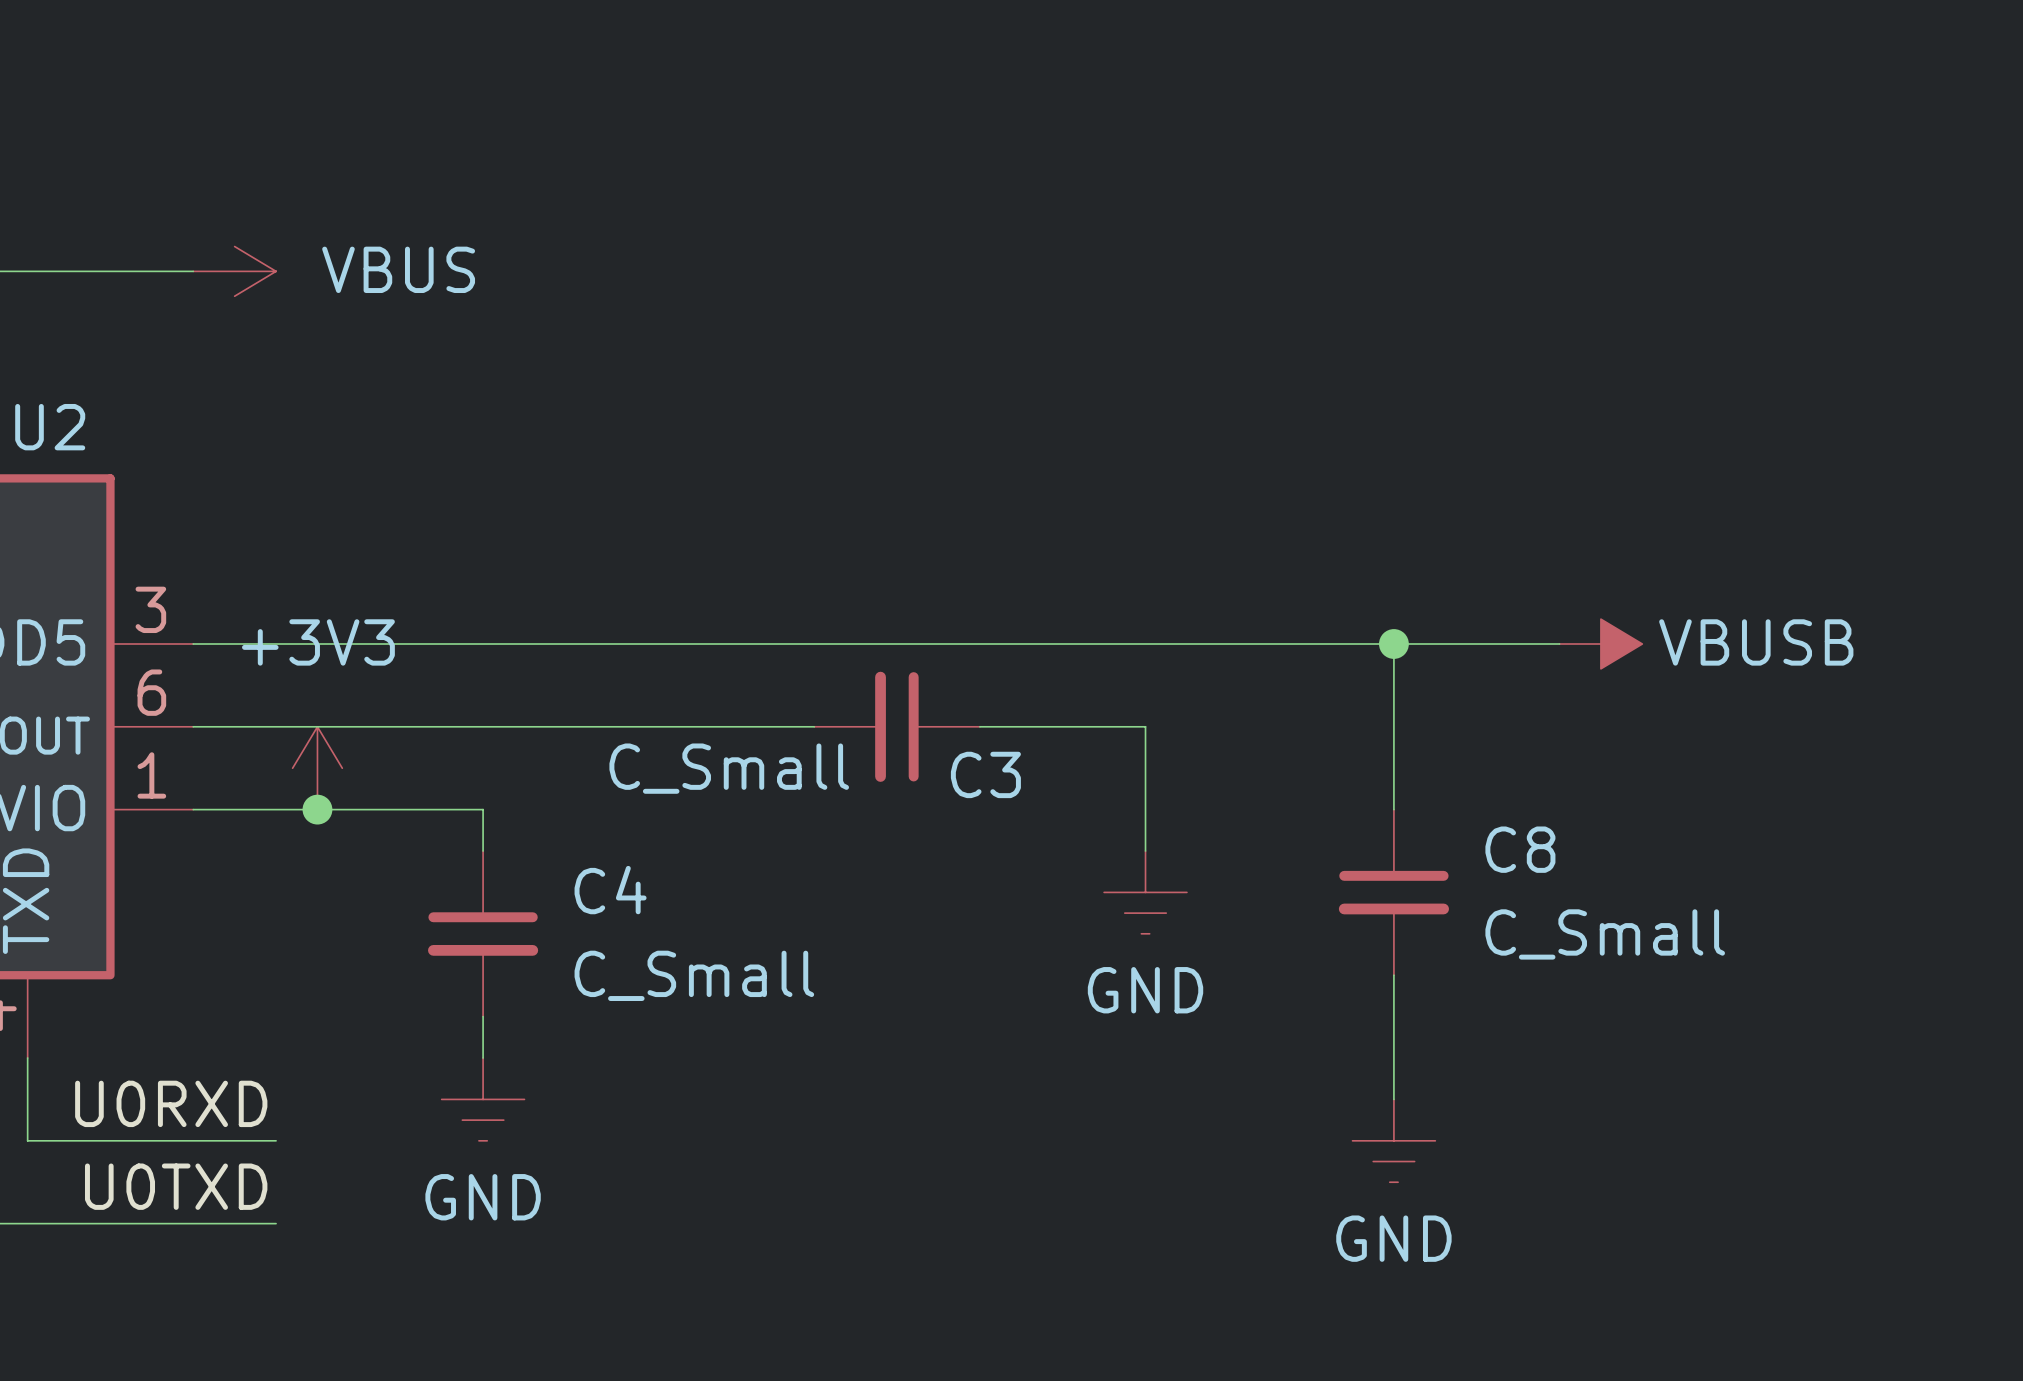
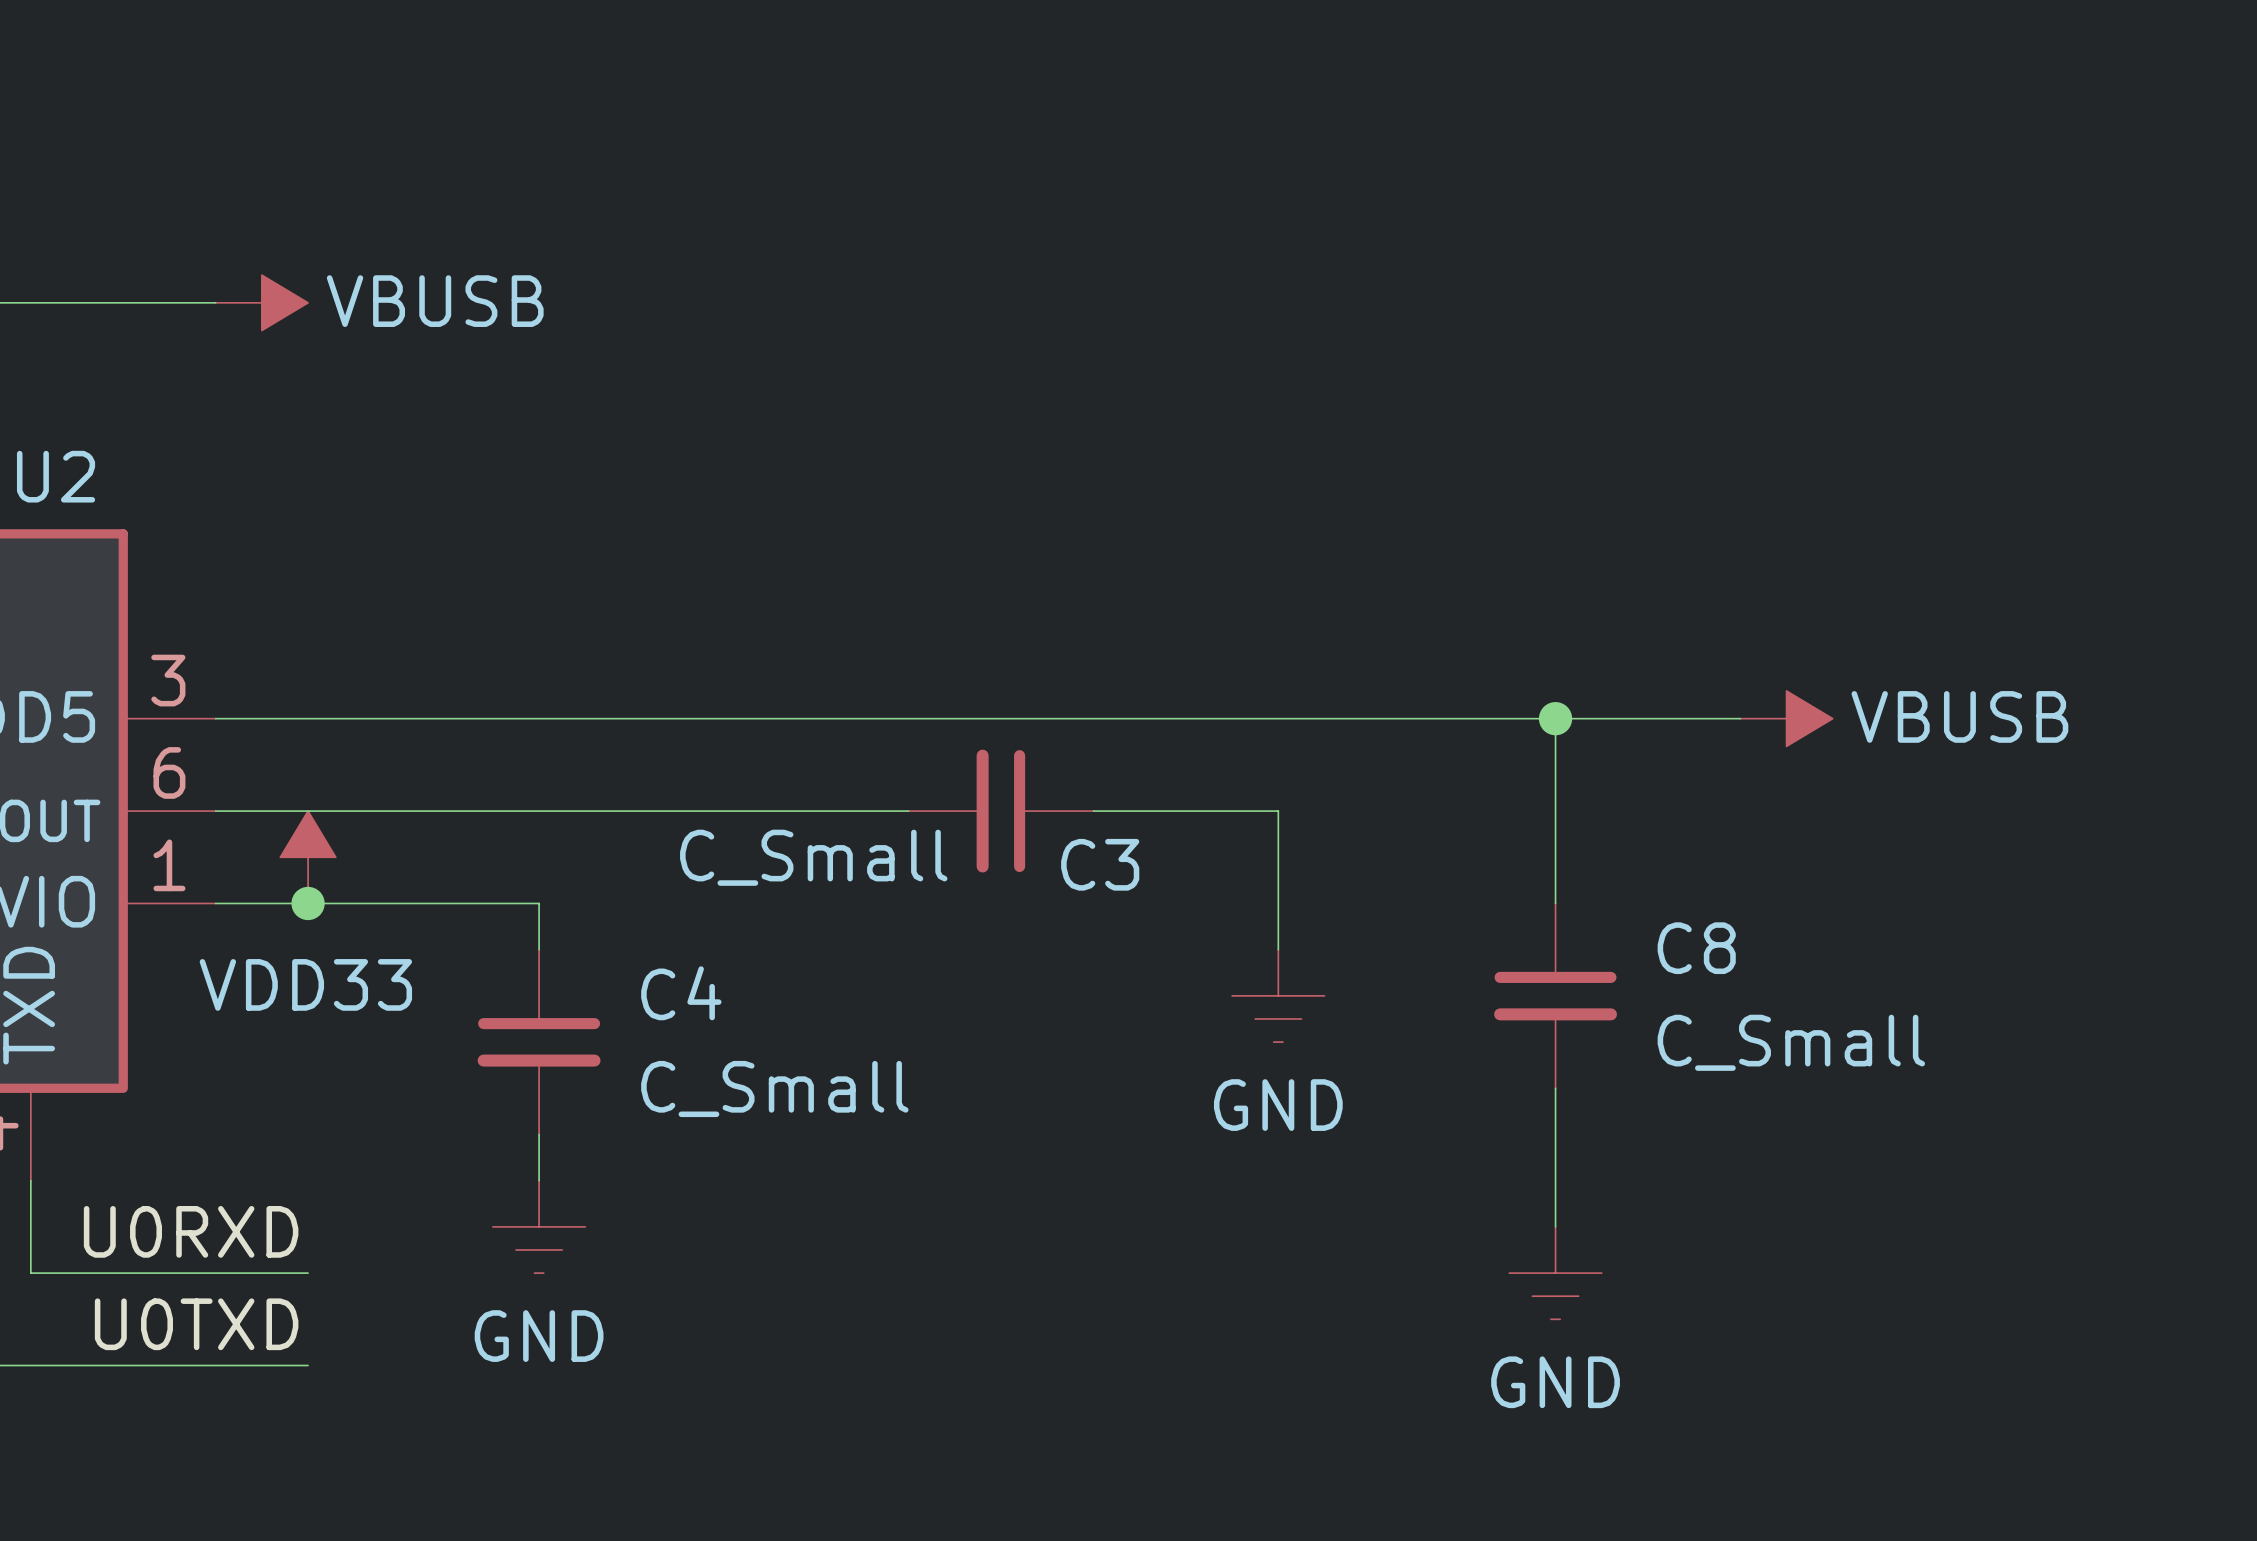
power symbol: VBUS (234, 271) -> VBUSB (261, 302)
power symbol: none -> VDD33 (308, 857)
power symbol: +3V3 (317, 768) -> none
junction position: (317, 809) -> (308, 903)

